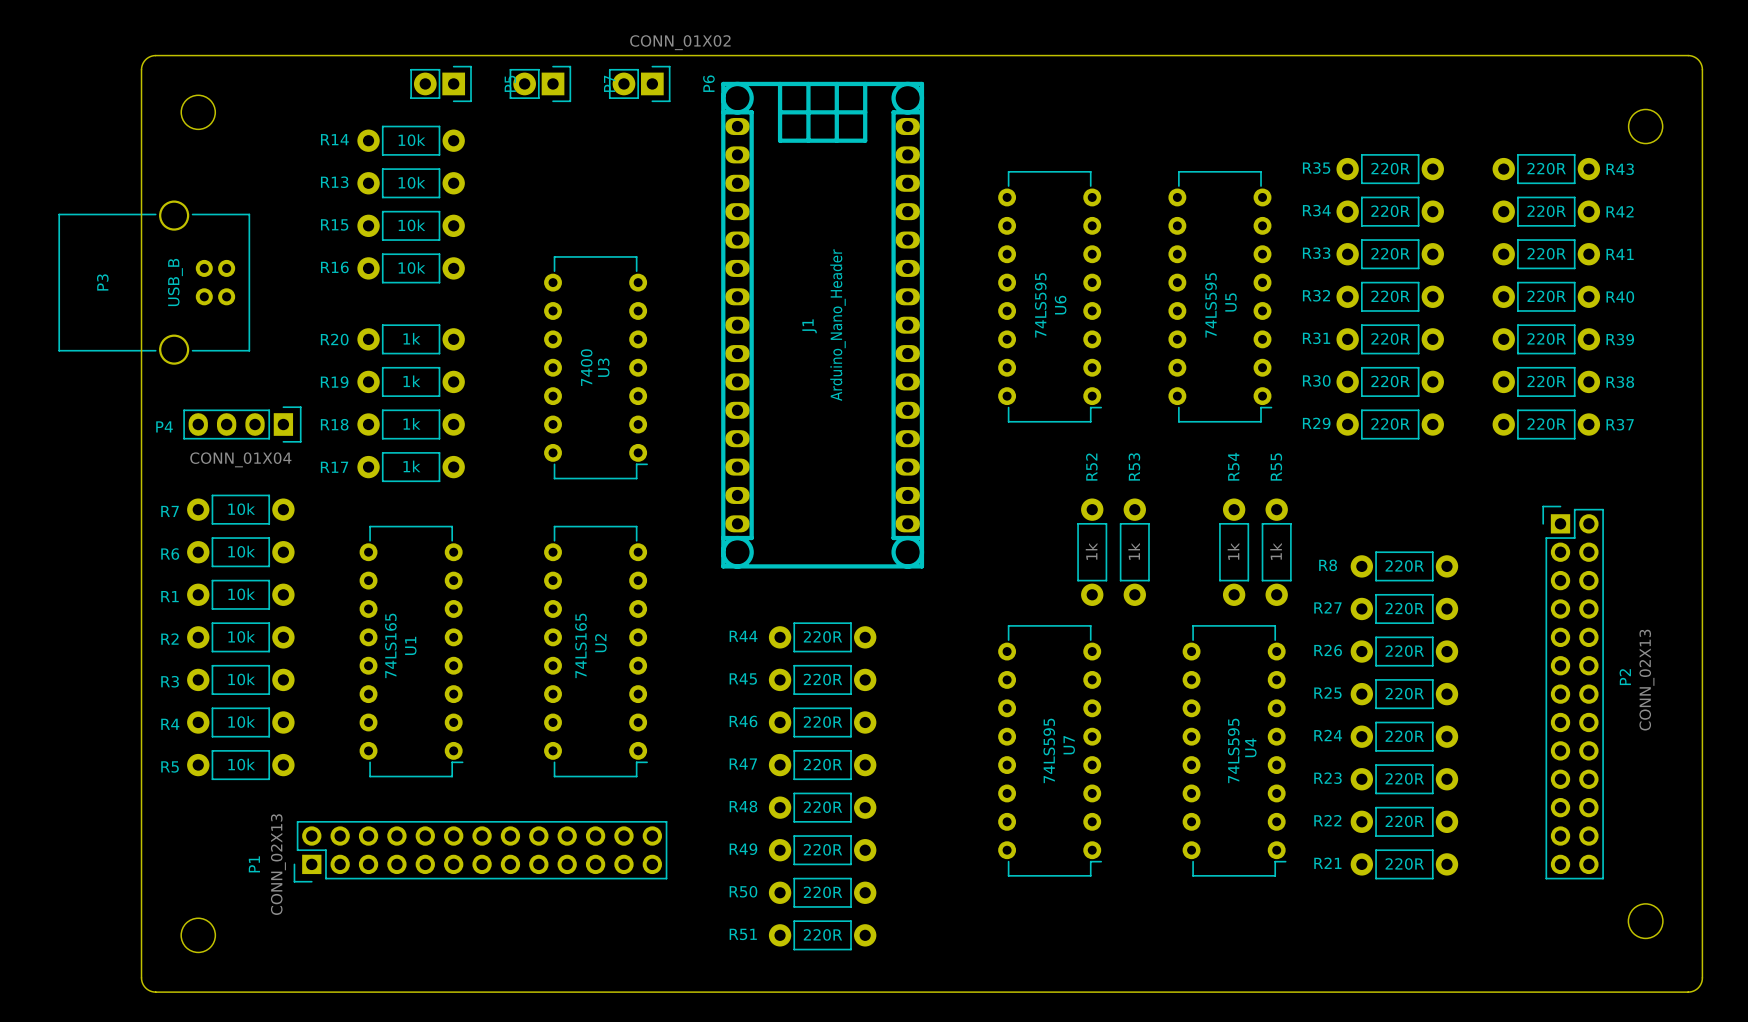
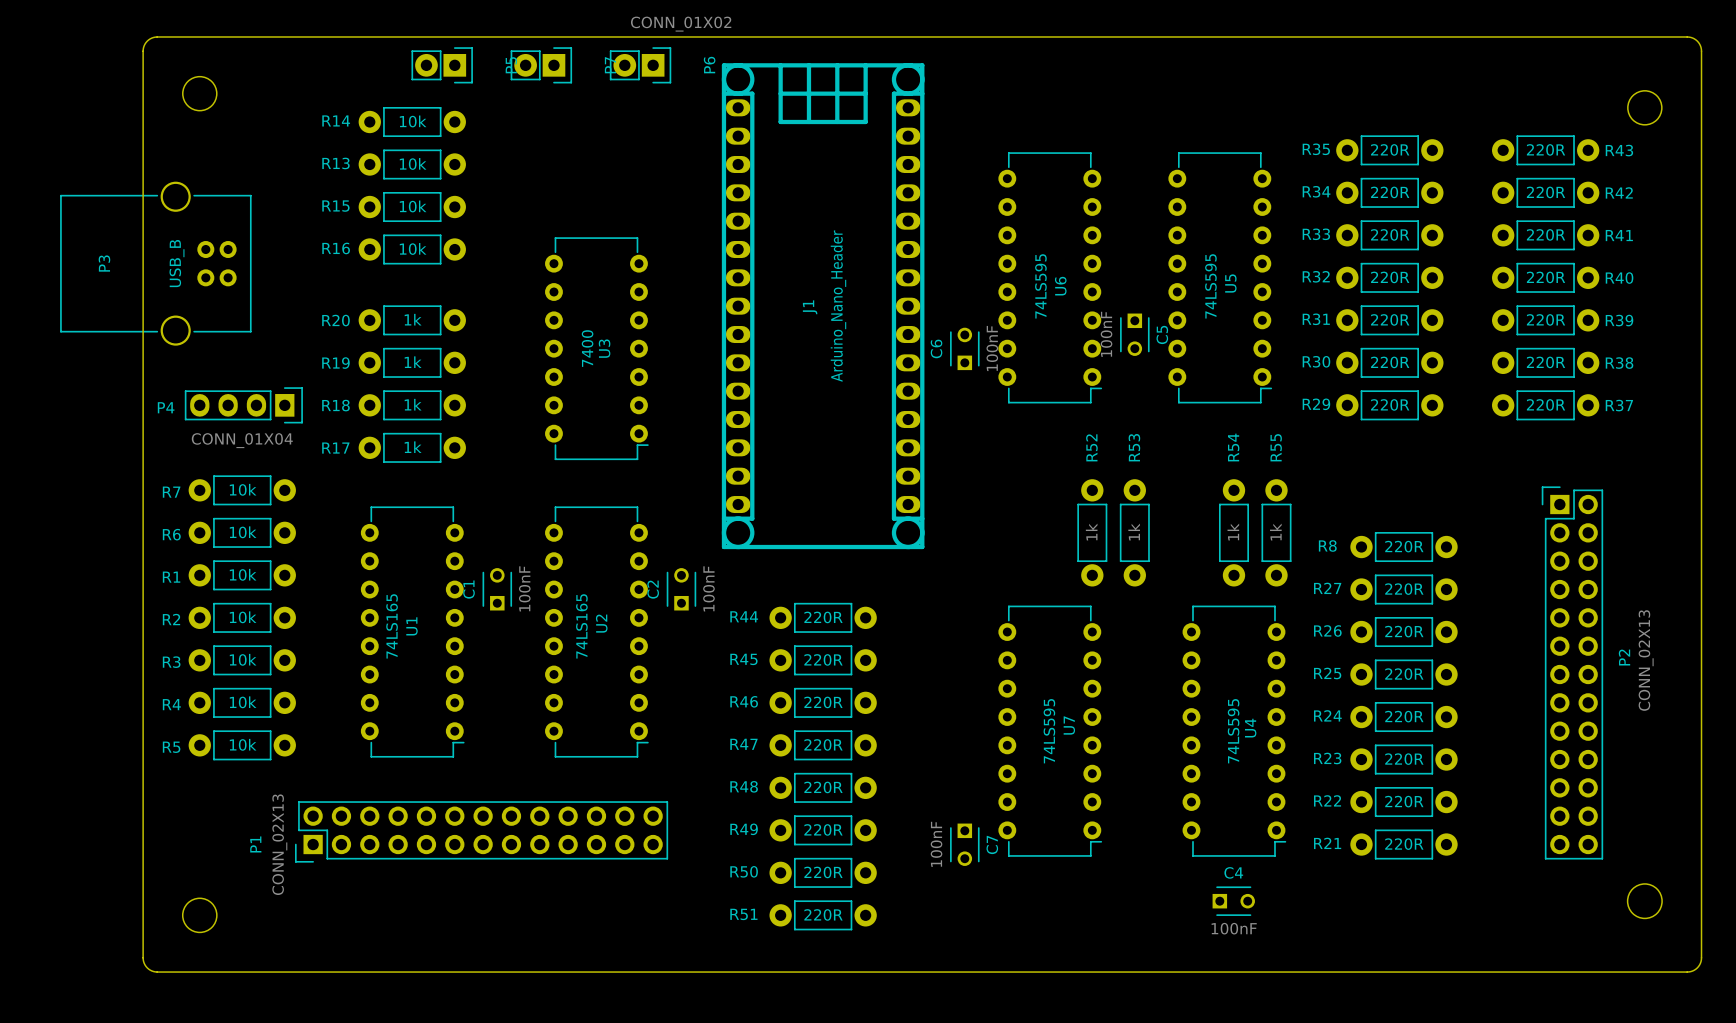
C5: none -> 100nF (1134, 334)
C6: none -> 100nF (964, 348)
C1: none -> 100nF (497, 589)
C2: none -> 100nF (681, 589)
C7: none -> 100nF (964, 844)
C4: none -> 100nF (1233, 901)

